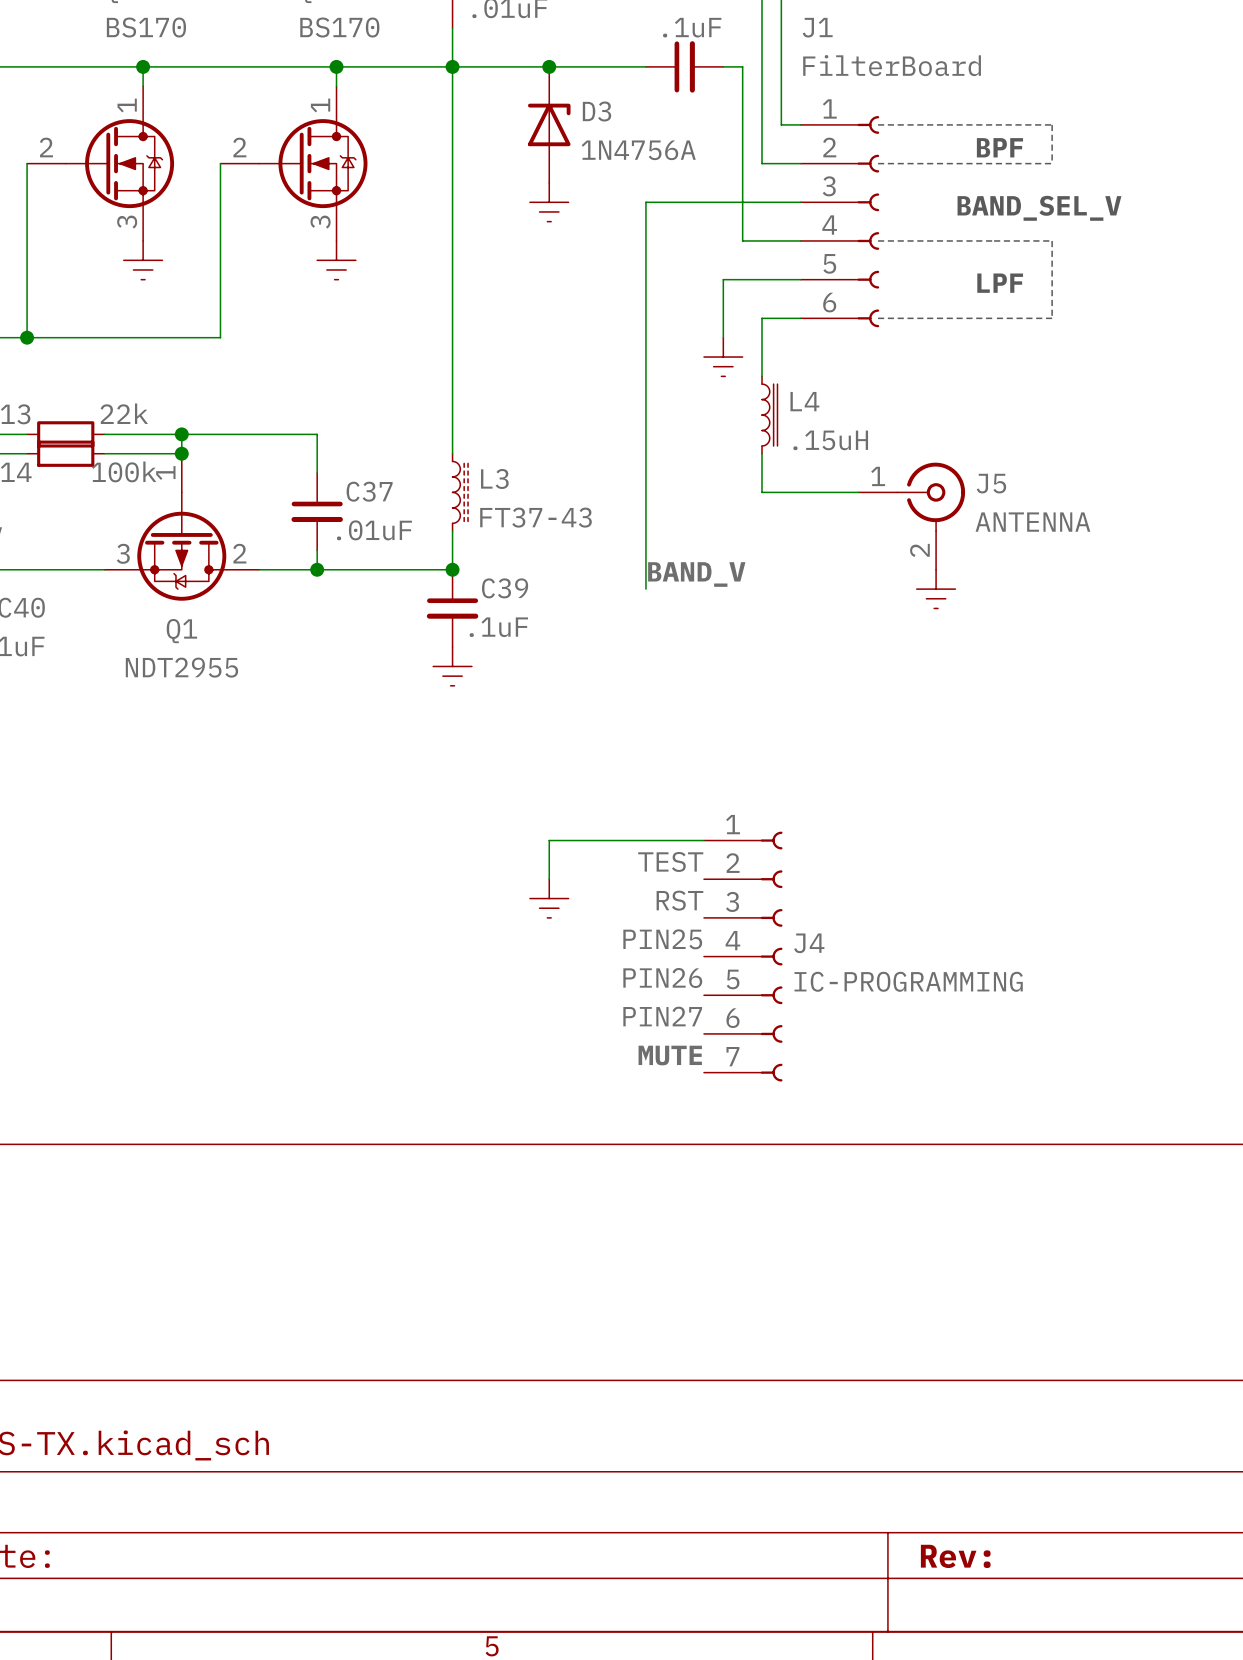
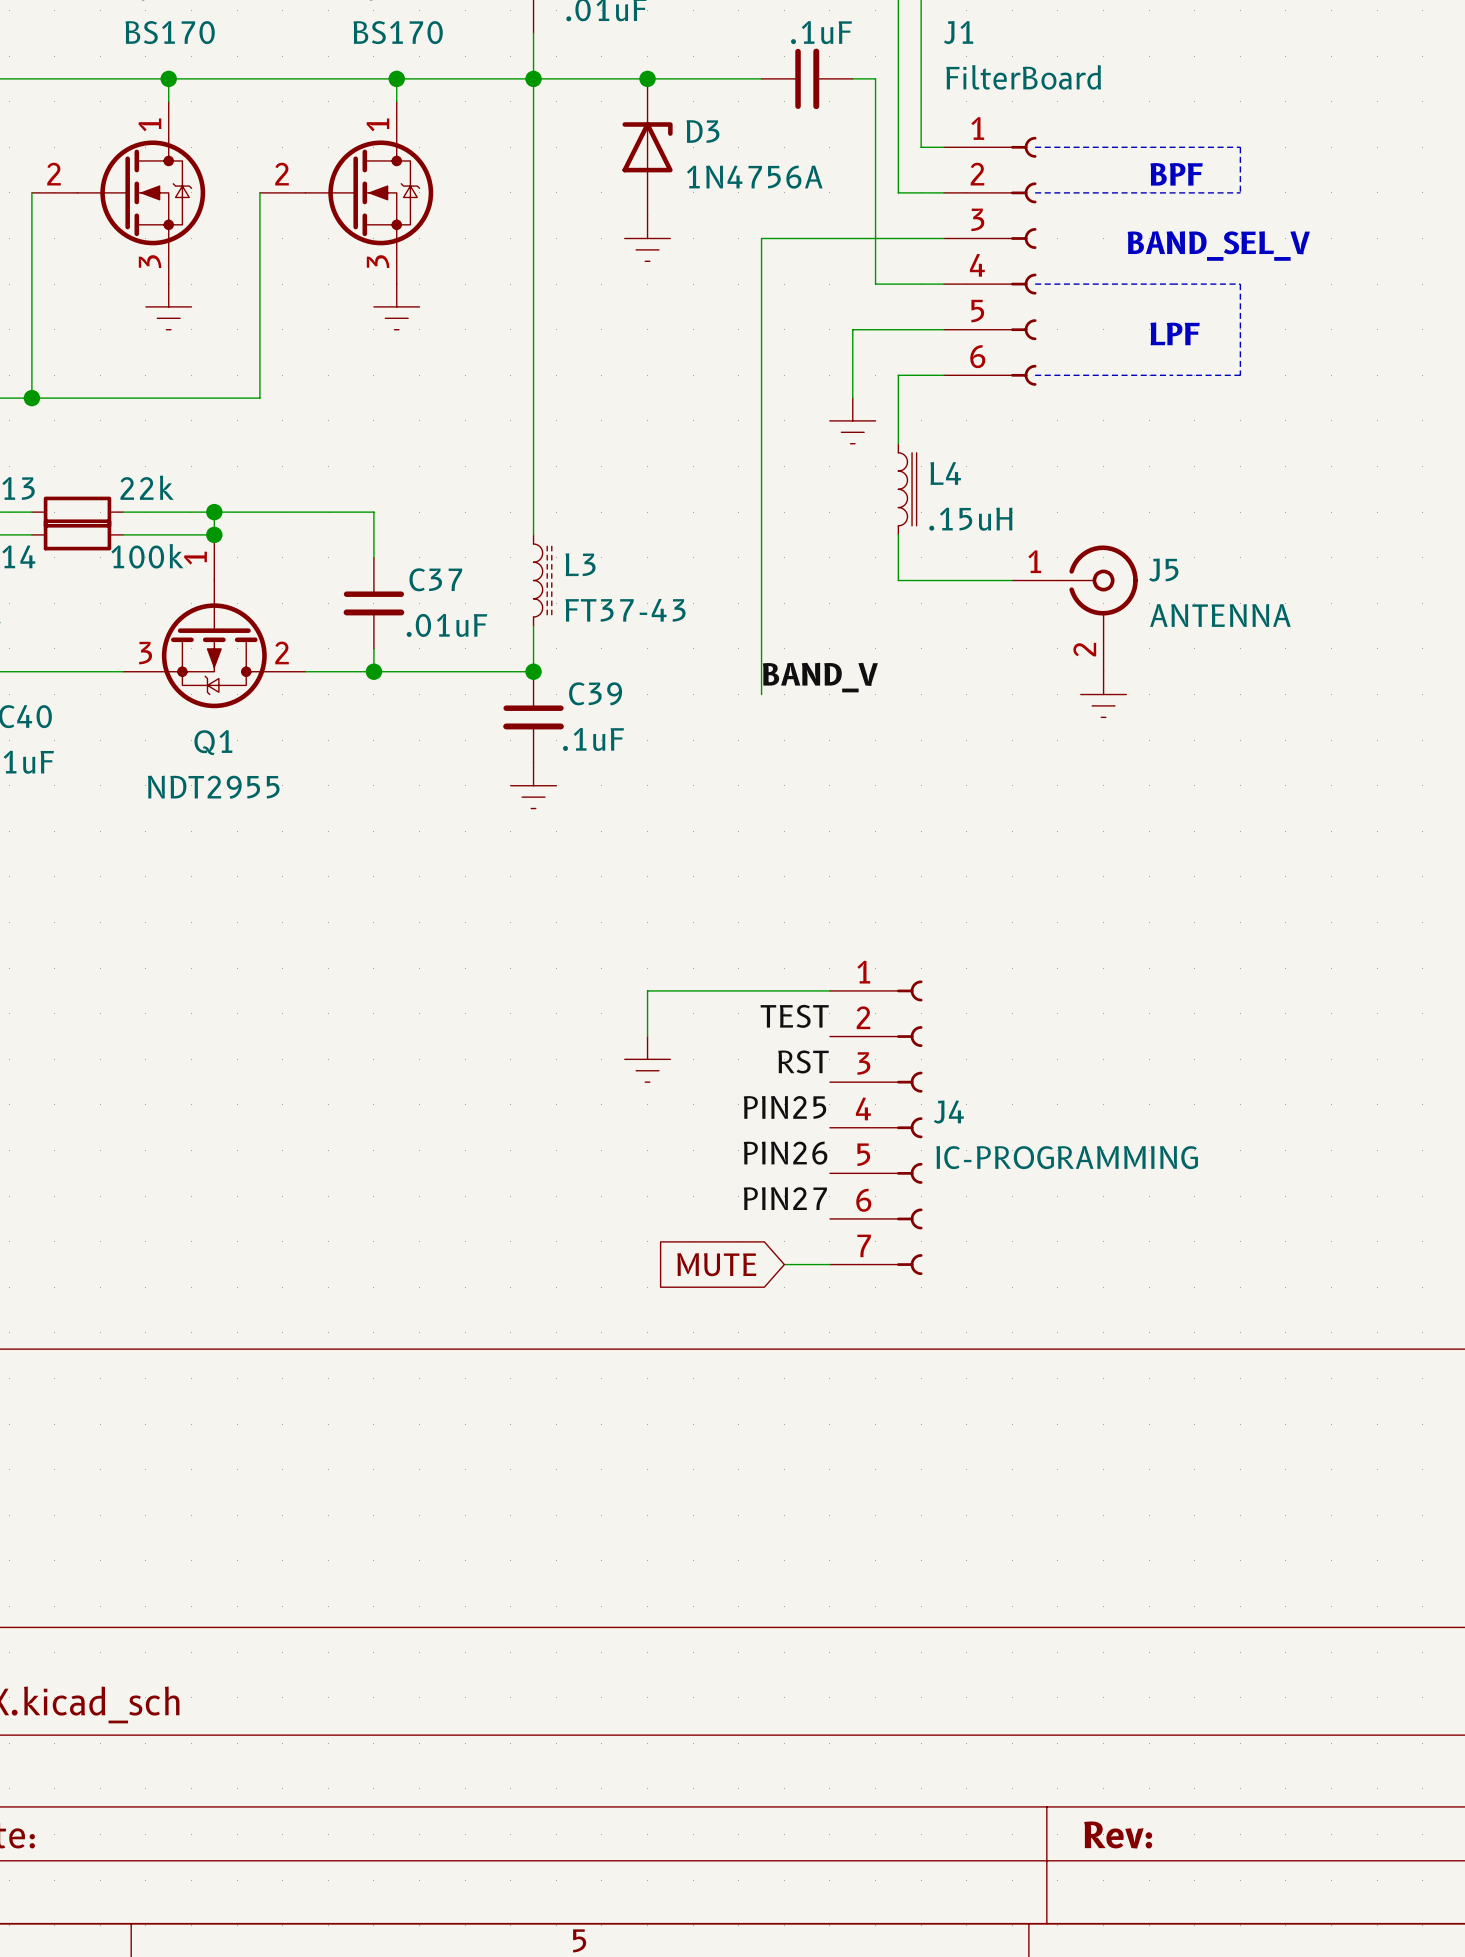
label: MUTE (670, 1055) -> none
global label: none -> MUTE (716, 1264)
wire: none -> (784, 1264) (829, 1264)

